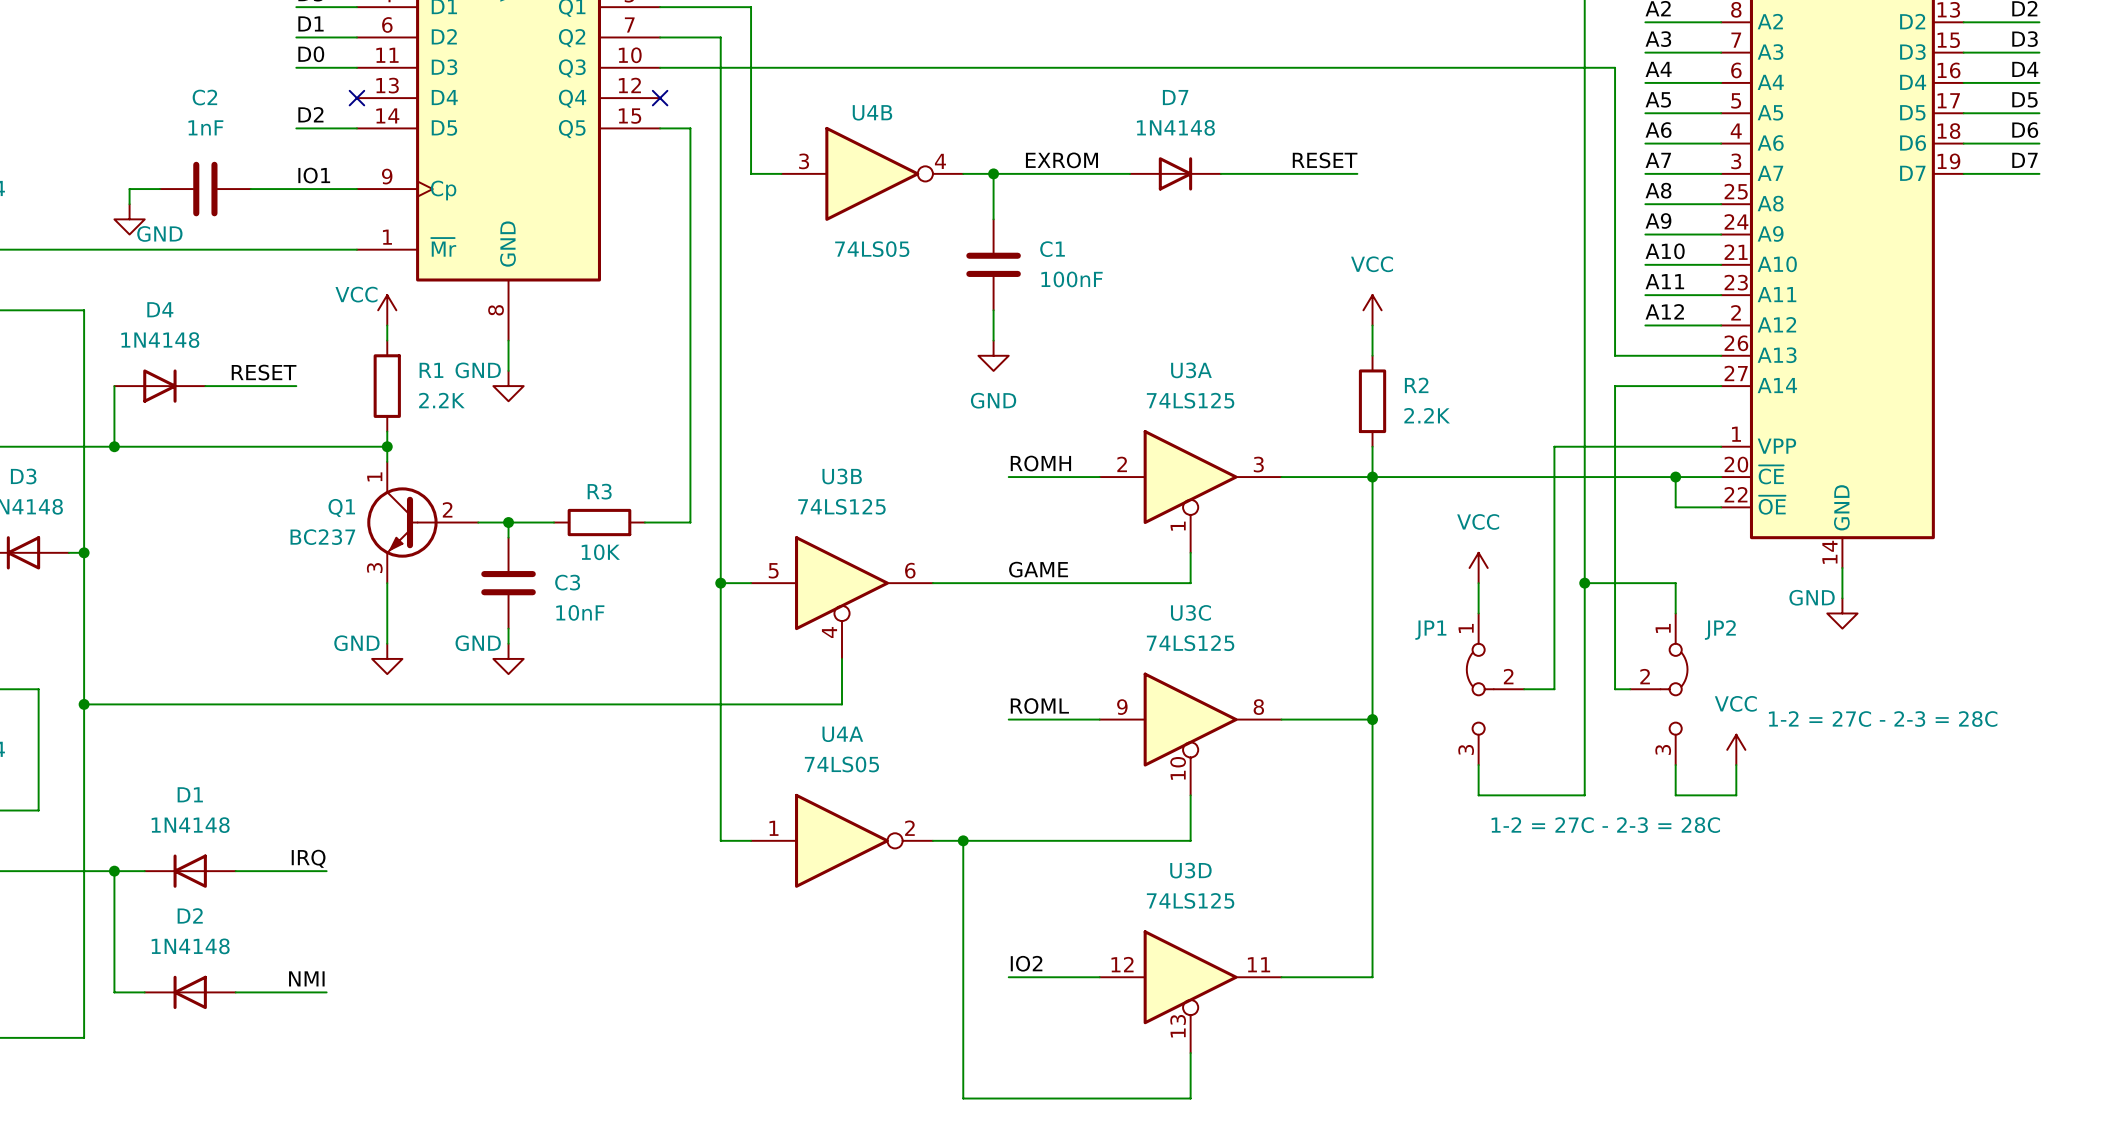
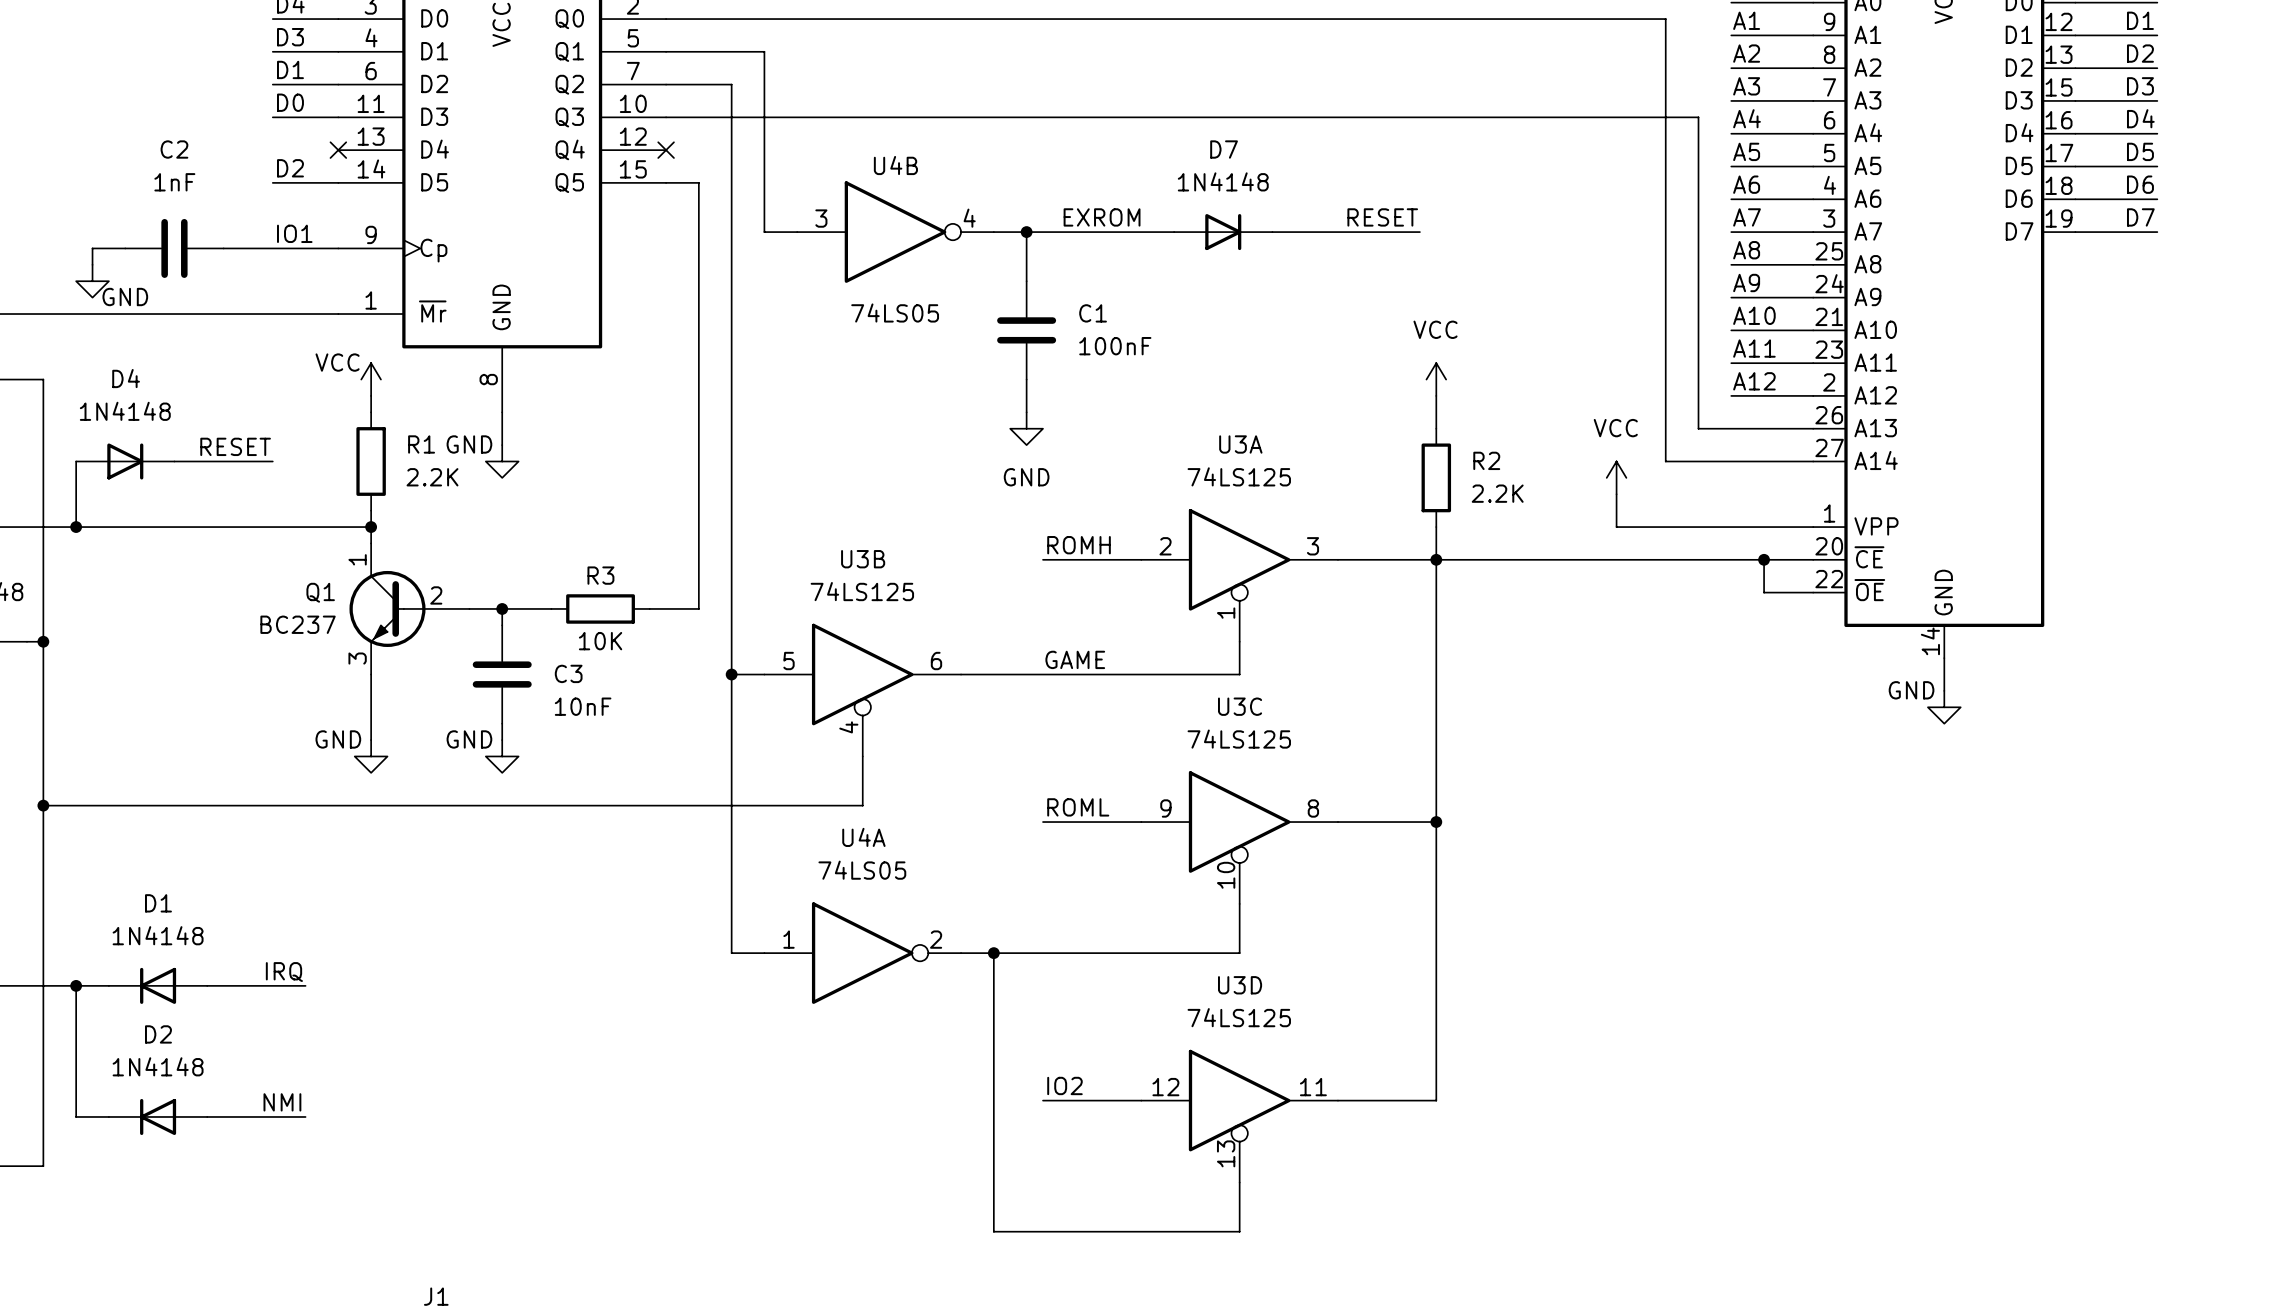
wire: (1584, 386) (1584, 795) (1478, 795) (1478, 765) -> none
wire: (1615, 386) (1615, 689) (1630, 689) -> (1698, 461) (1665, 461)
wire: (1554, 446) (1554, 689) (1524, 689) -> (1632, 527) (1616, 527) (1616, 494)
power symbol position: VCC (1478, 567) -> VCC (1616, 477)
wire: (1478, 583) (1478, 613) -> none
wire: (1584, 583) (1675, 583) (1675, 613) -> none
junction: (1584, 583) -> none
JP1: 1-2 = 27C - 2-3 = 28C (1495, 689) -> none
JP2: 1-2 = 27C - 2-3 = 28C (1658, 689) -> none
power symbol: VCC (1736, 749) -> none
wire: (1675, 765) (1675, 795) (1736, 795) (1736, 765) -> none

